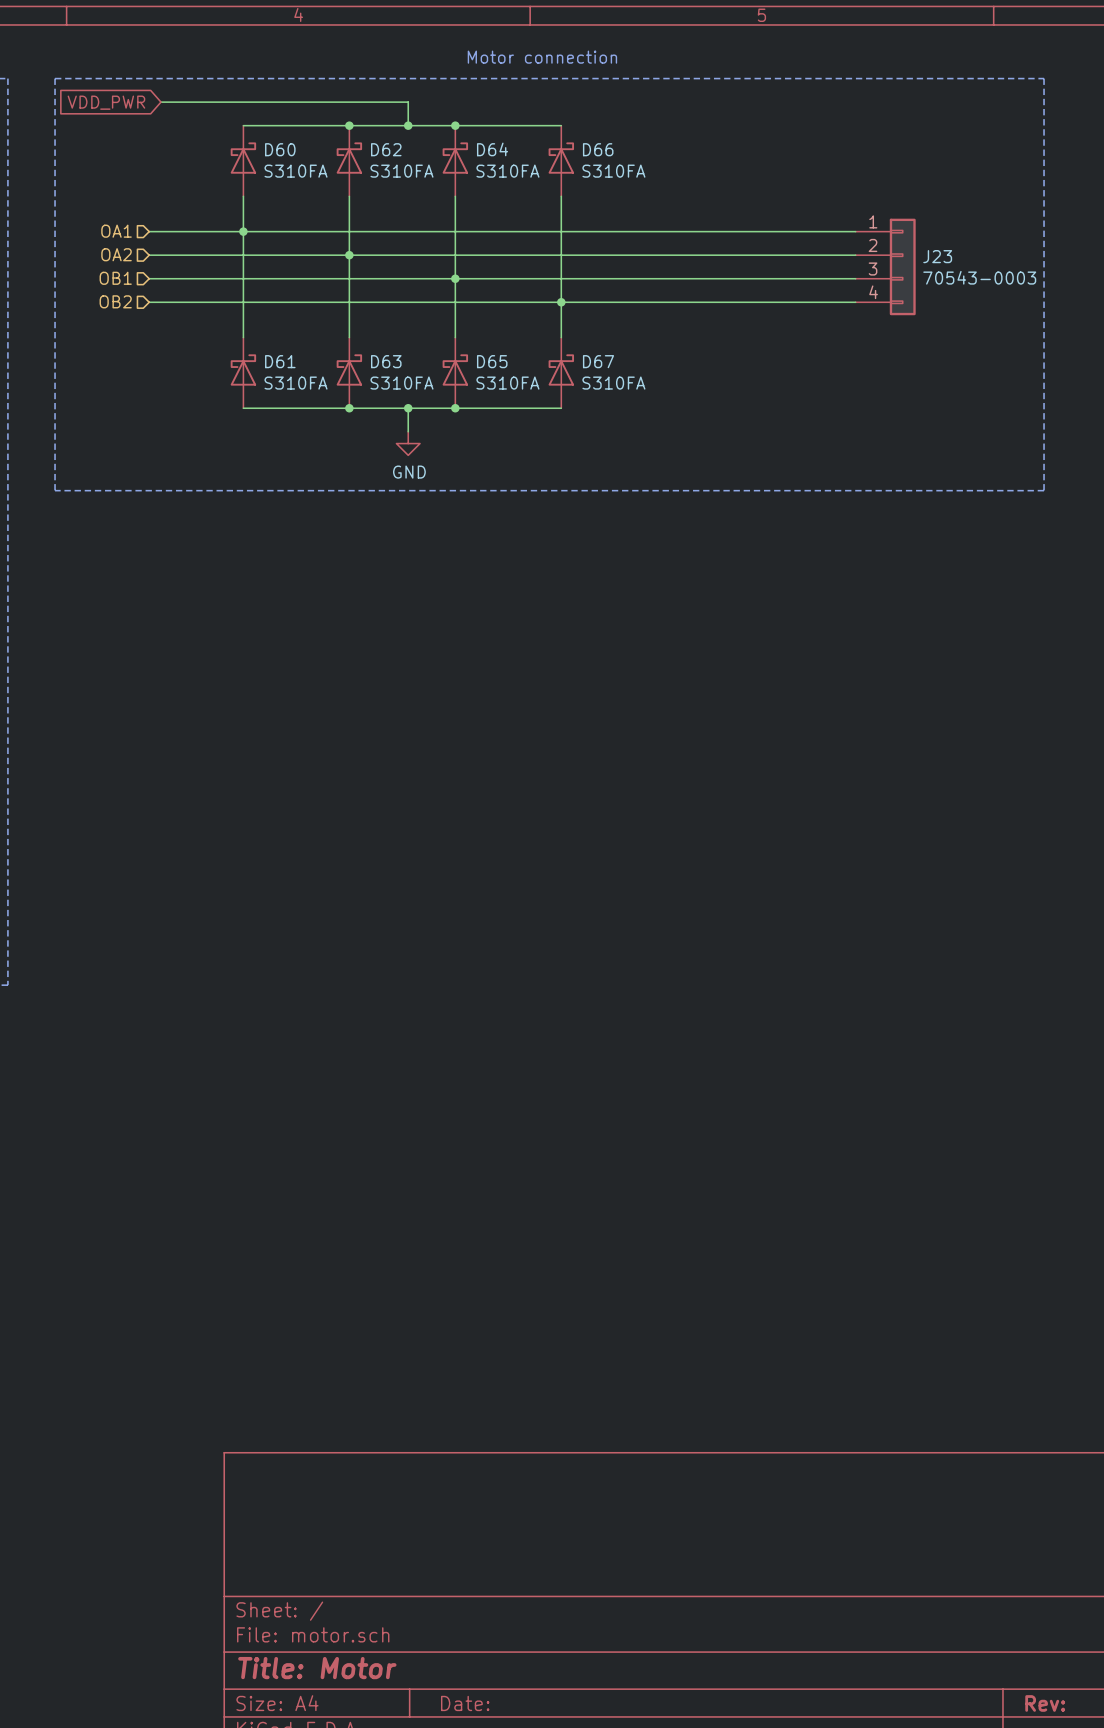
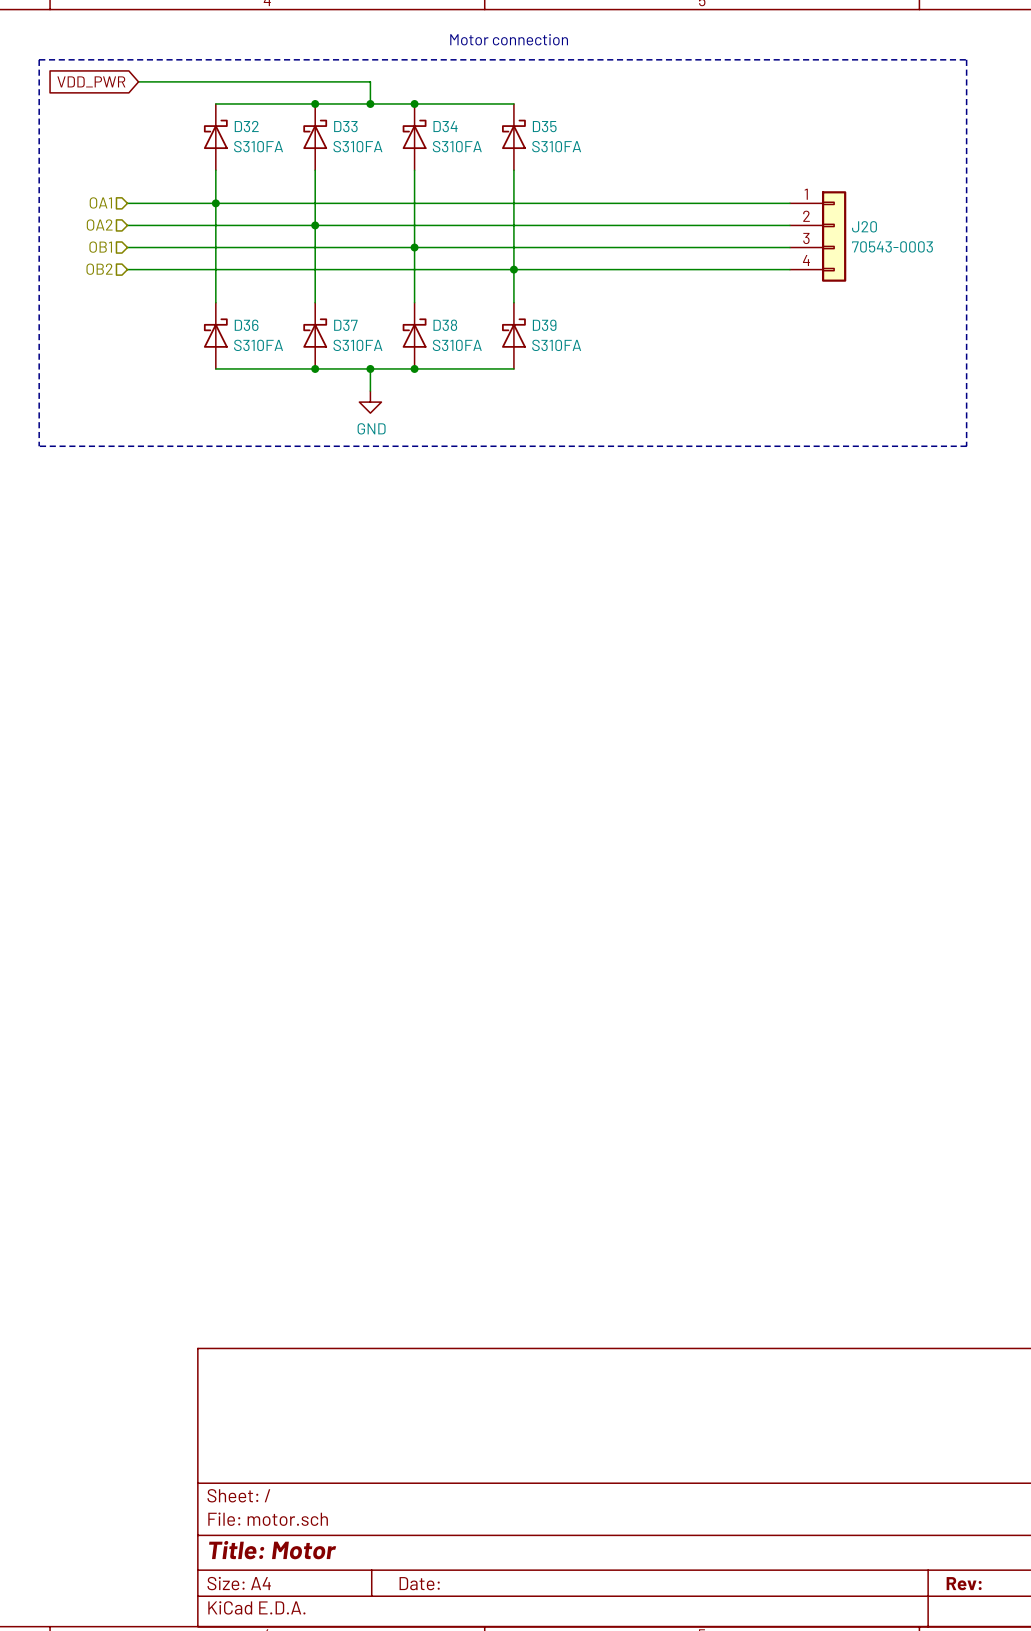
D60 name: D60 (280, 149) -> D32 (246, 126)
D62 name: D62 (386, 149) -> D33 (345, 126)
D64 name: D64 (492, 149) -> D34 (445, 126)
D66 name: D66 (598, 149) -> D35 (544, 126)
J23 name: J23 (937, 256) -> J20 (864, 226)
D61 name: D61 (280, 361) -> D36 (246, 325)
D63 name: D63 (386, 361) -> D37 (345, 325)
D65 name: D65 (492, 361) -> D38 (445, 325)
D67 name: D67 (598, 361) -> D39 (544, 325)

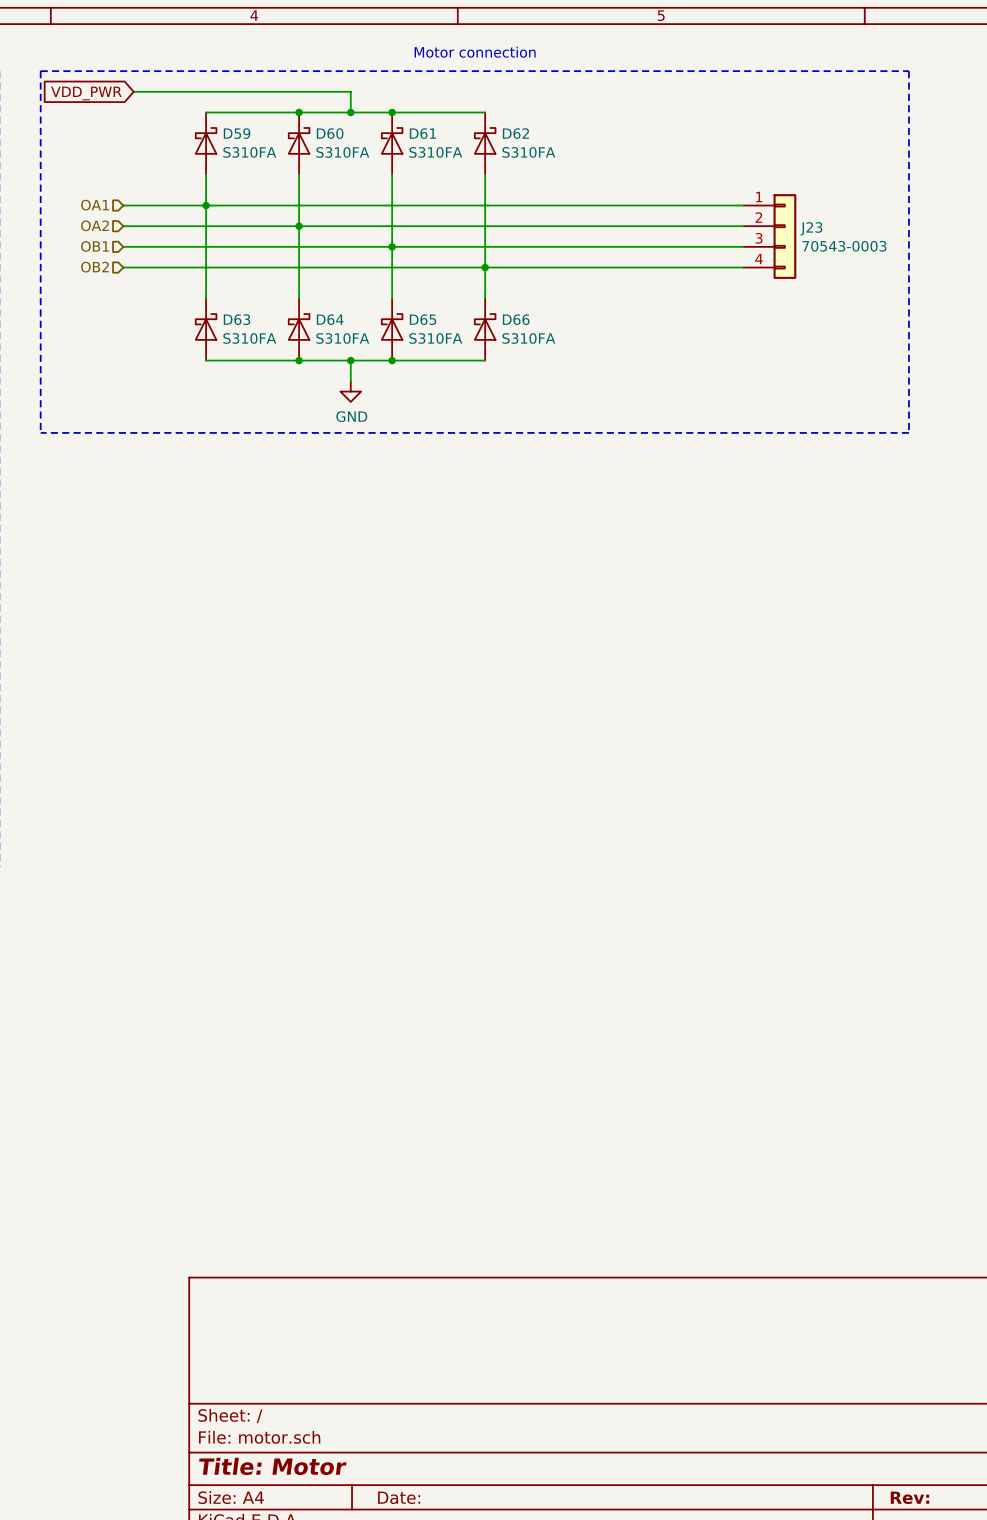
D32 name: D32 (246, 126) -> D59 (237, 133)
D33 name: D33 (345, 126) -> D60 (330, 133)
D34 name: D34 (445, 126) -> D61 (422, 133)
D35 name: D35 (544, 126) -> D62 (515, 133)
J20 name: J20 (864, 226) -> J23 (811, 228)
D36 name: D36 (246, 325) -> D63 (237, 319)
D37 name: D37 (345, 325) -> D64 (330, 319)
D38 name: D38 (445, 325) -> D65 (423, 319)
D39 name: D39 (544, 325) -> D66 (516, 319)

